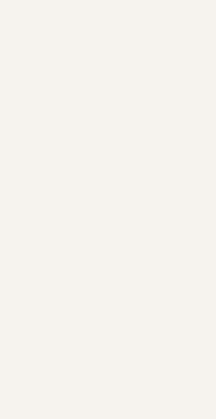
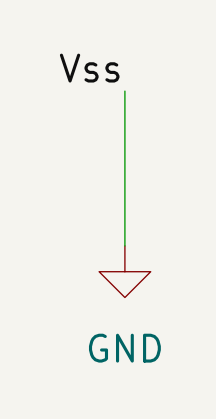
label: none -> Vss (89, 68)
wire: none -> (124, 91) (124, 245)
power symbol: none -> GND (124, 271)

